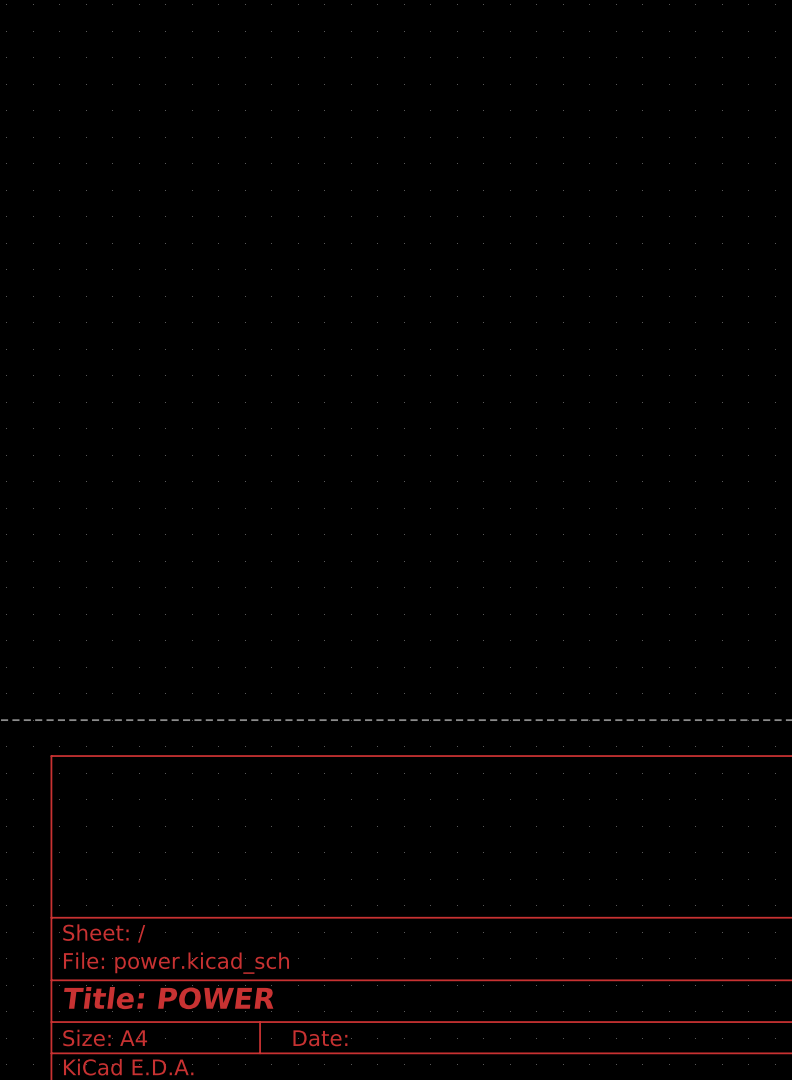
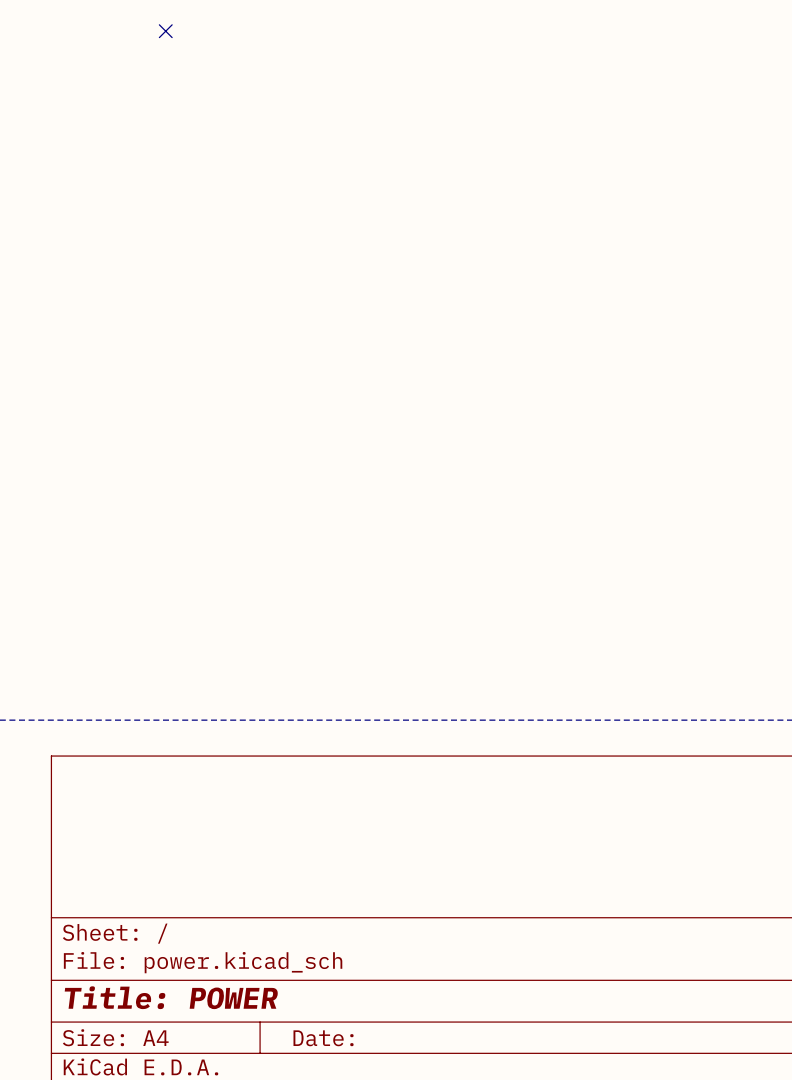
no-connect mark: none -> (165, 31)

